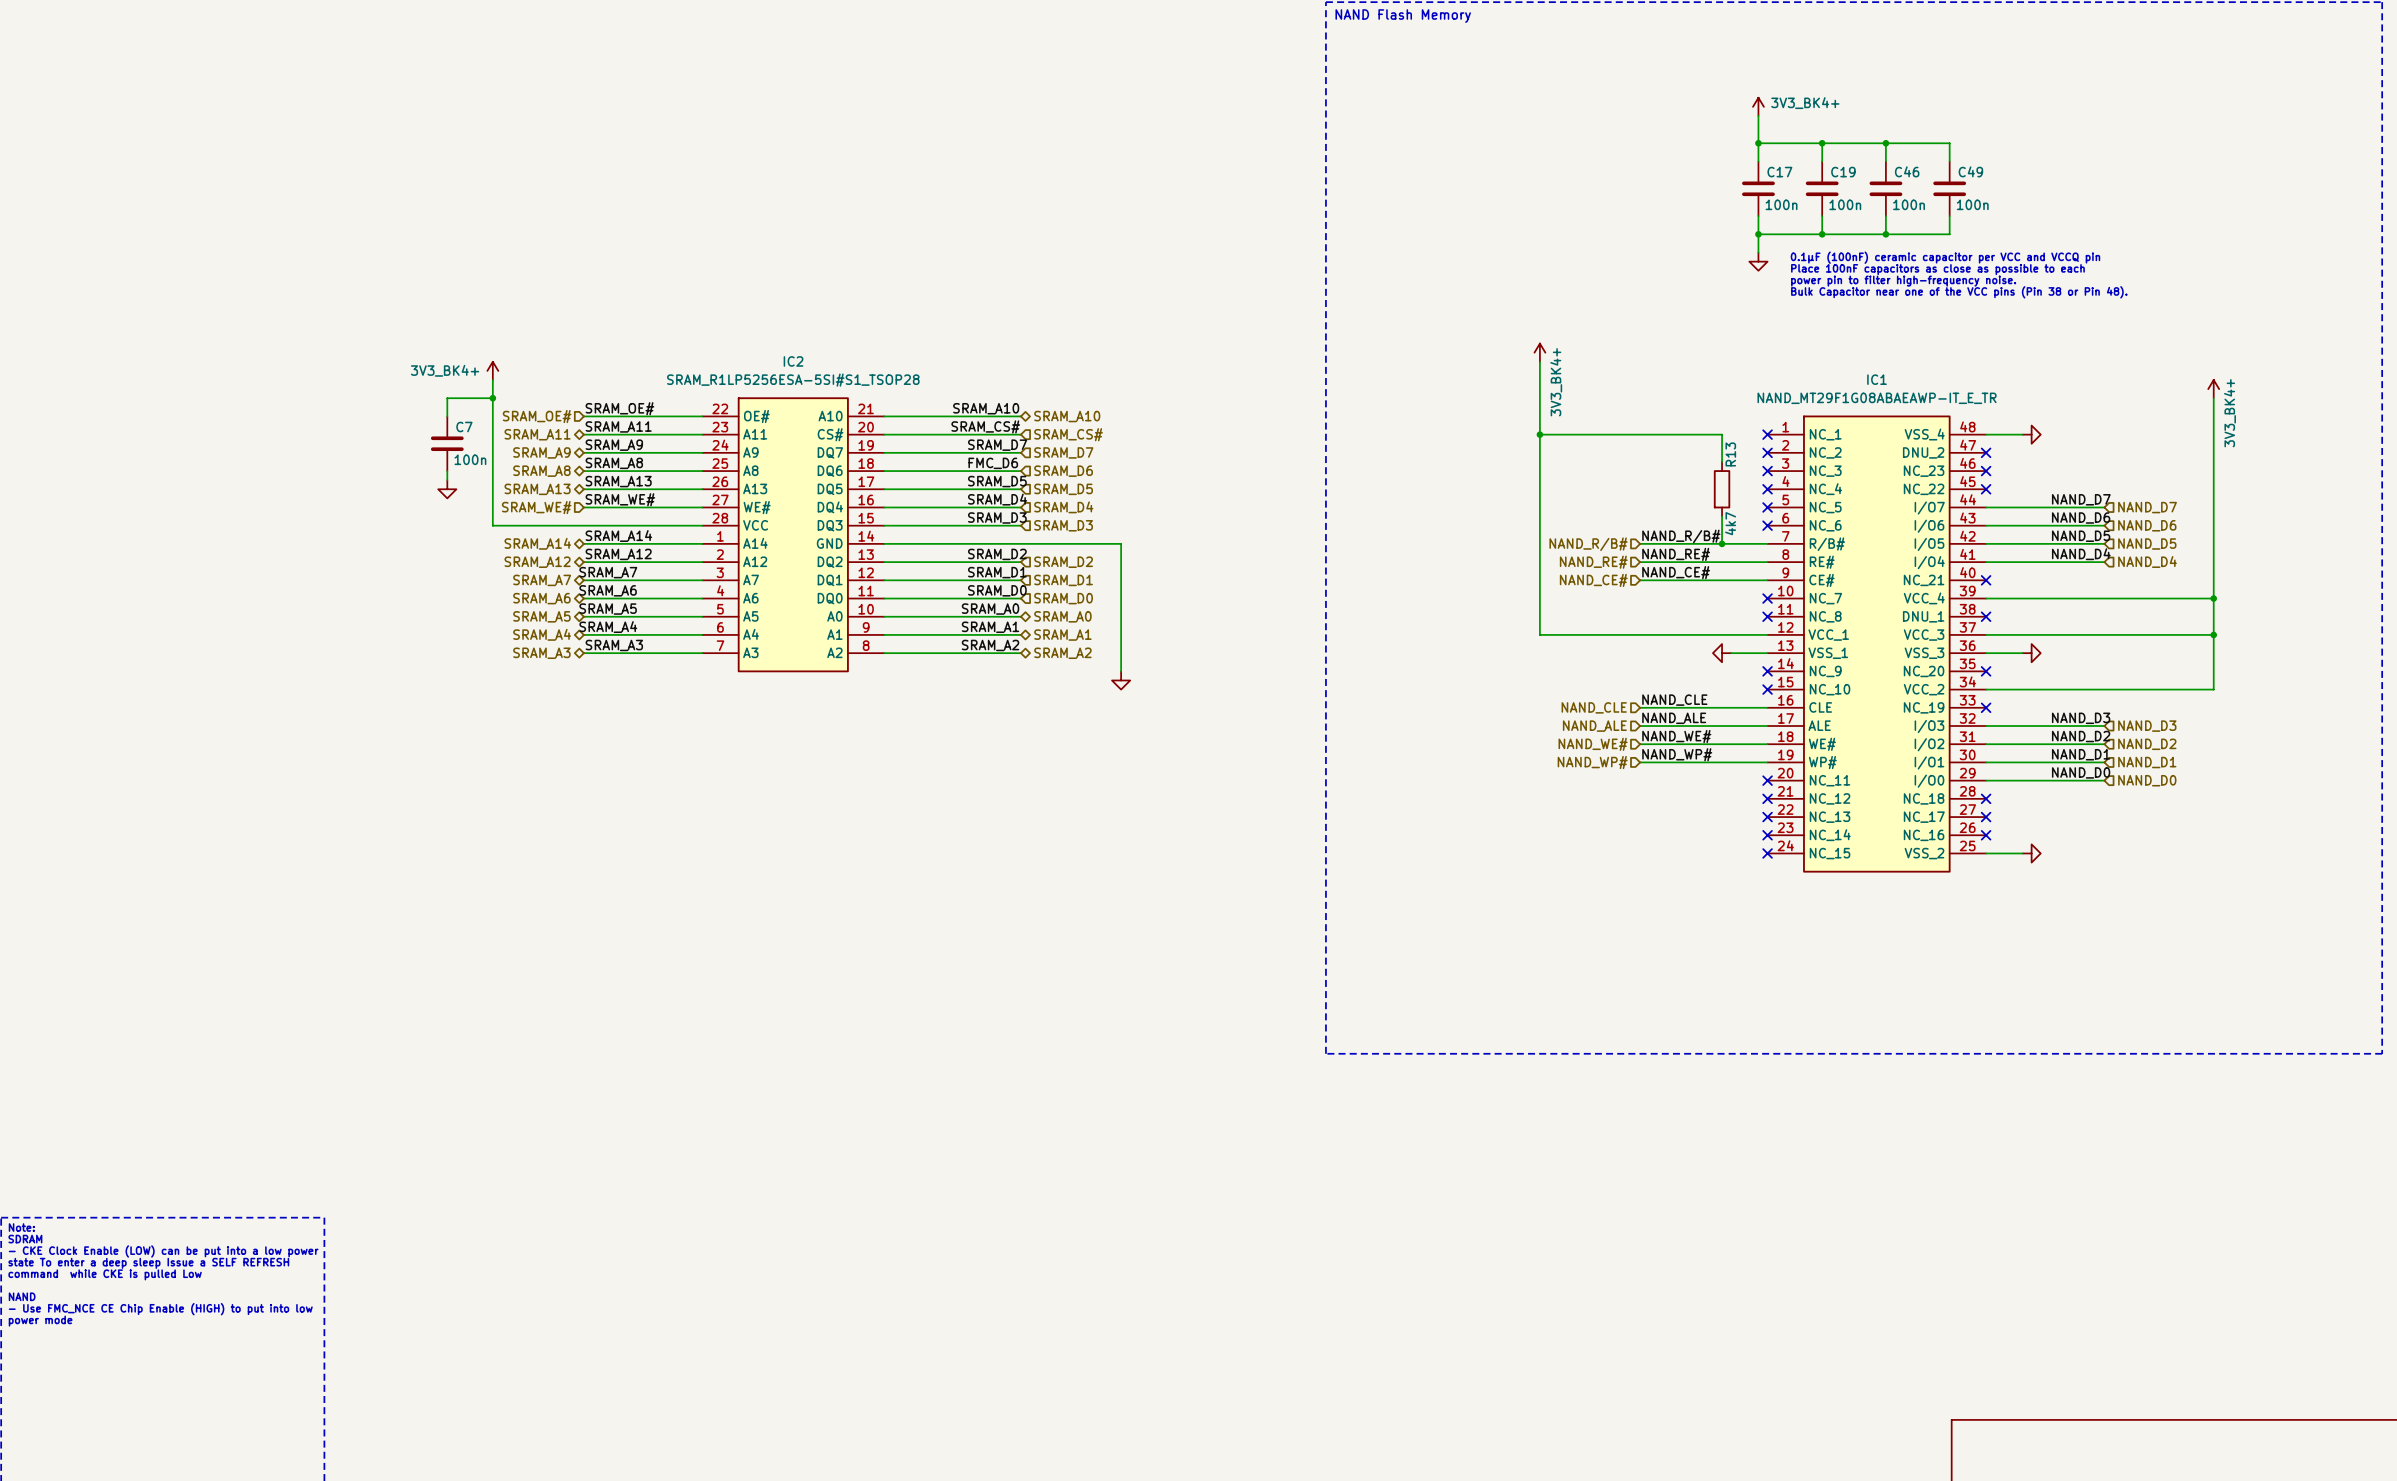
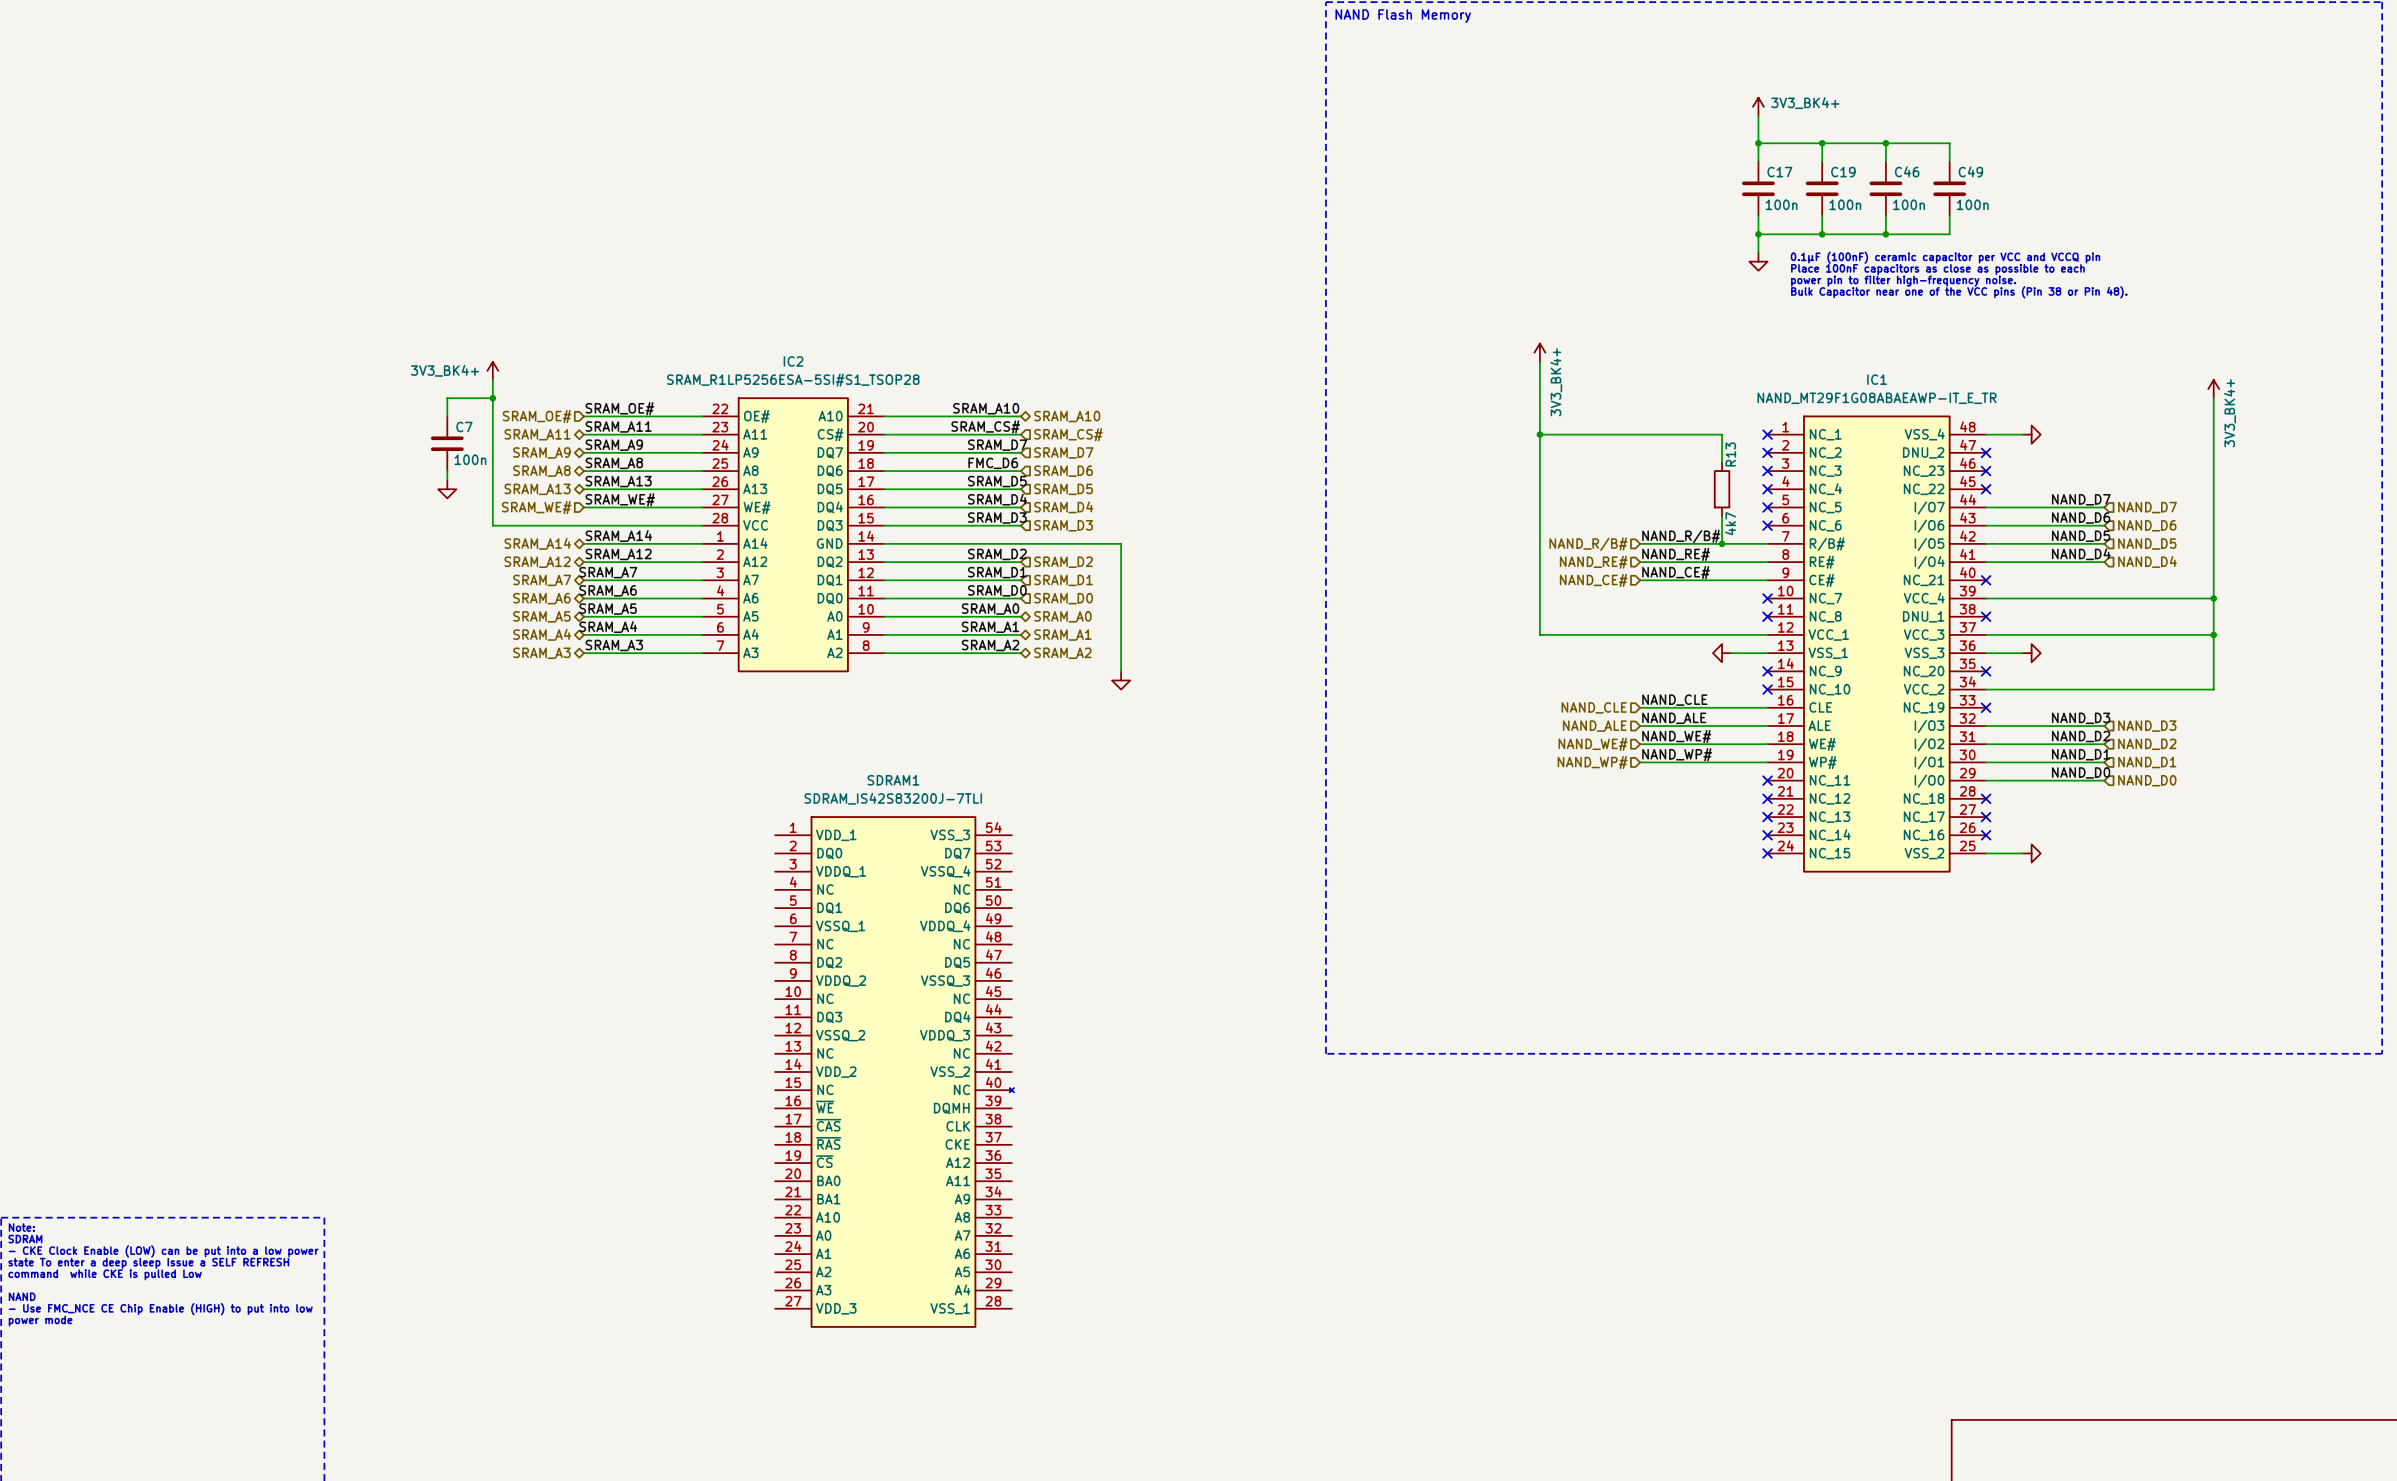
SDRAM1: none -> SDRAM_IS42S83200J-7TLI (894, 1071)

